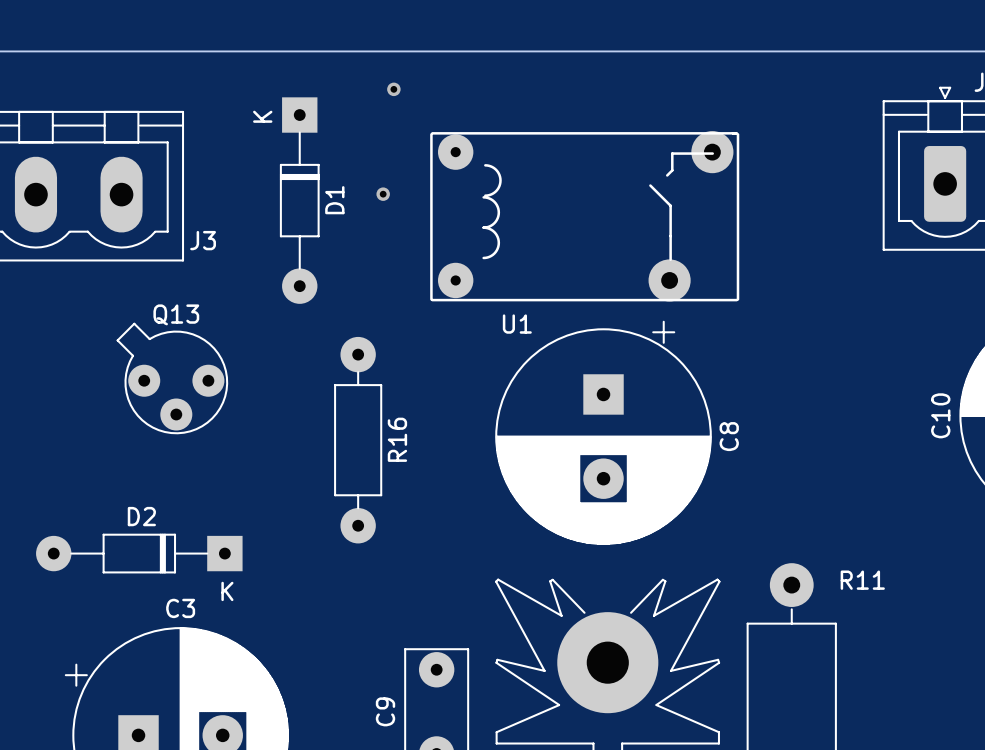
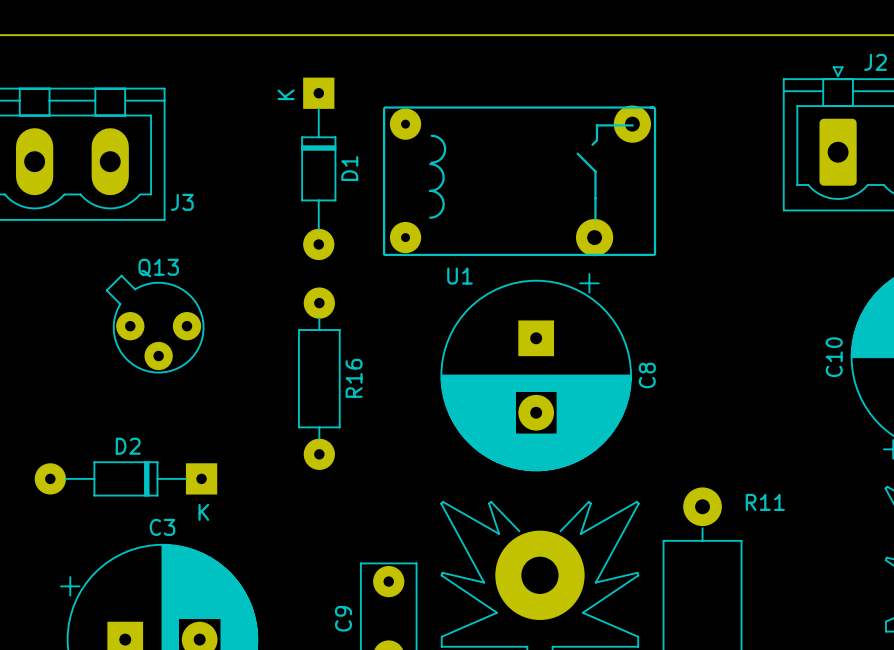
via: (393, 89) -> none
via: (383, 194) -> none
D1 position: (299, 200) -> (318, 168)

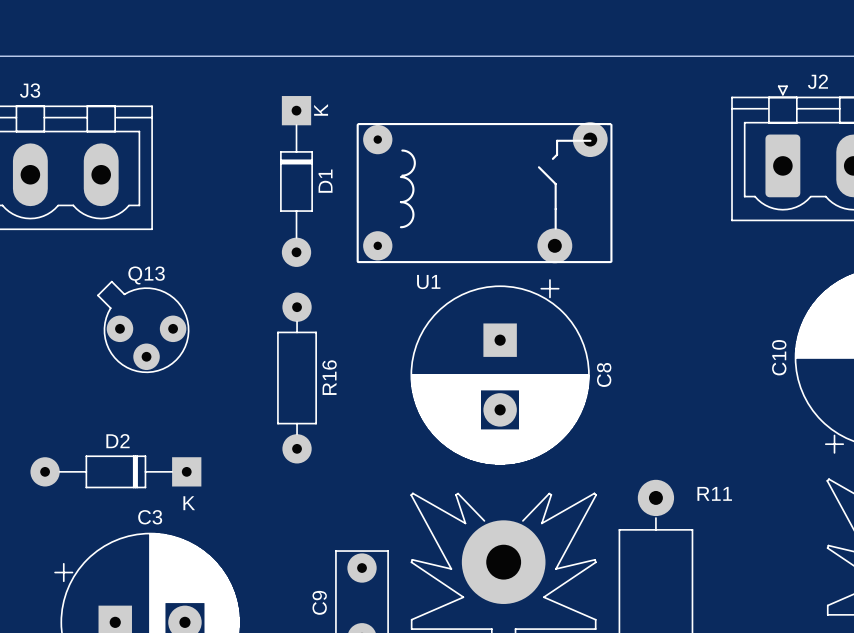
D1 text position: K (286, 94) -> K (321, 109)
J3 name position: J3 (182, 202) -> J3 (30, 90)

